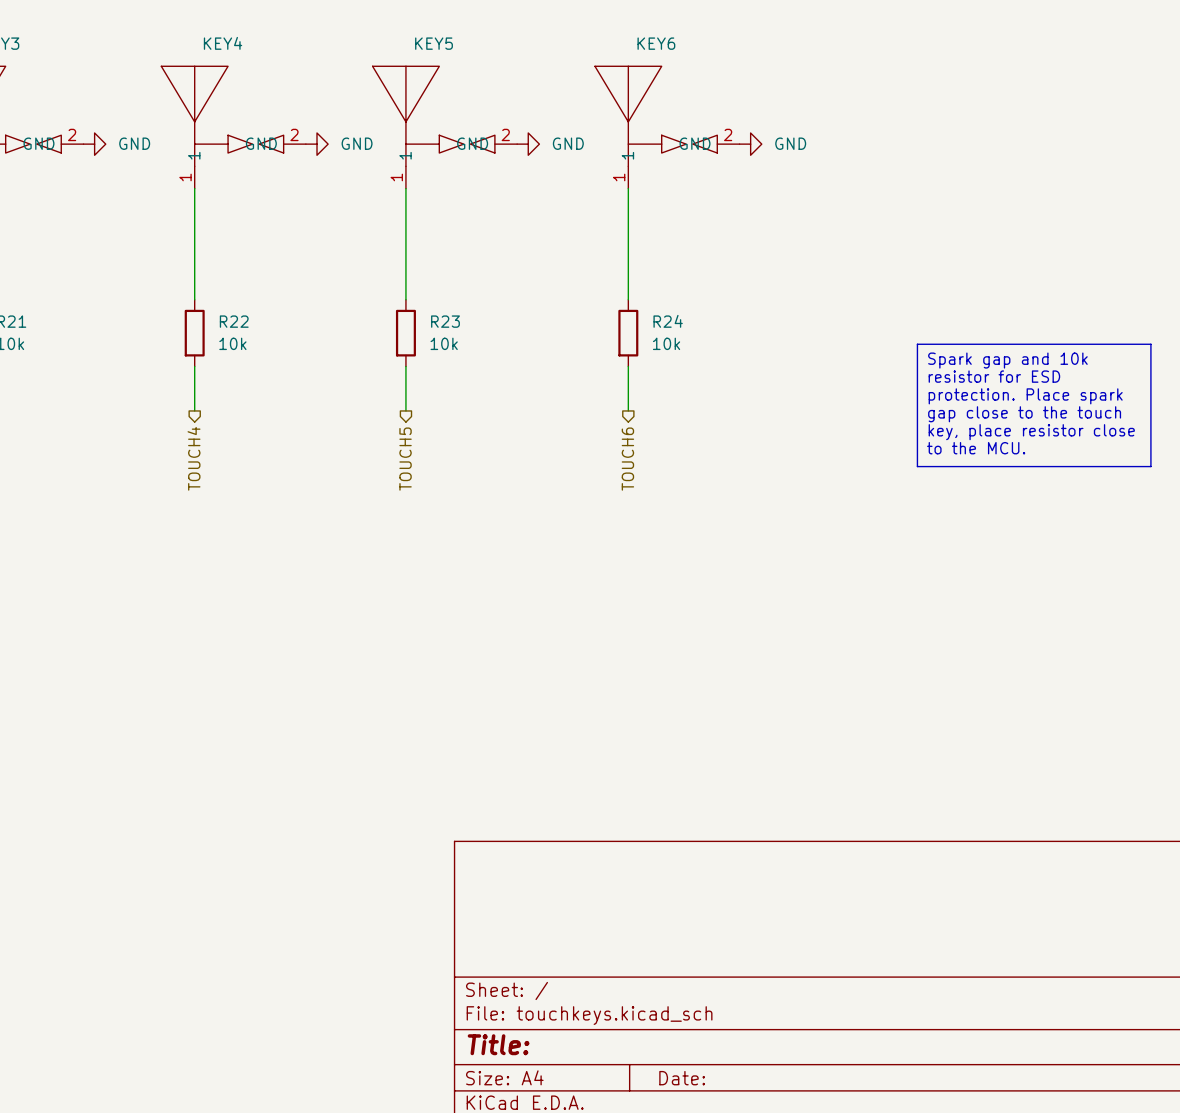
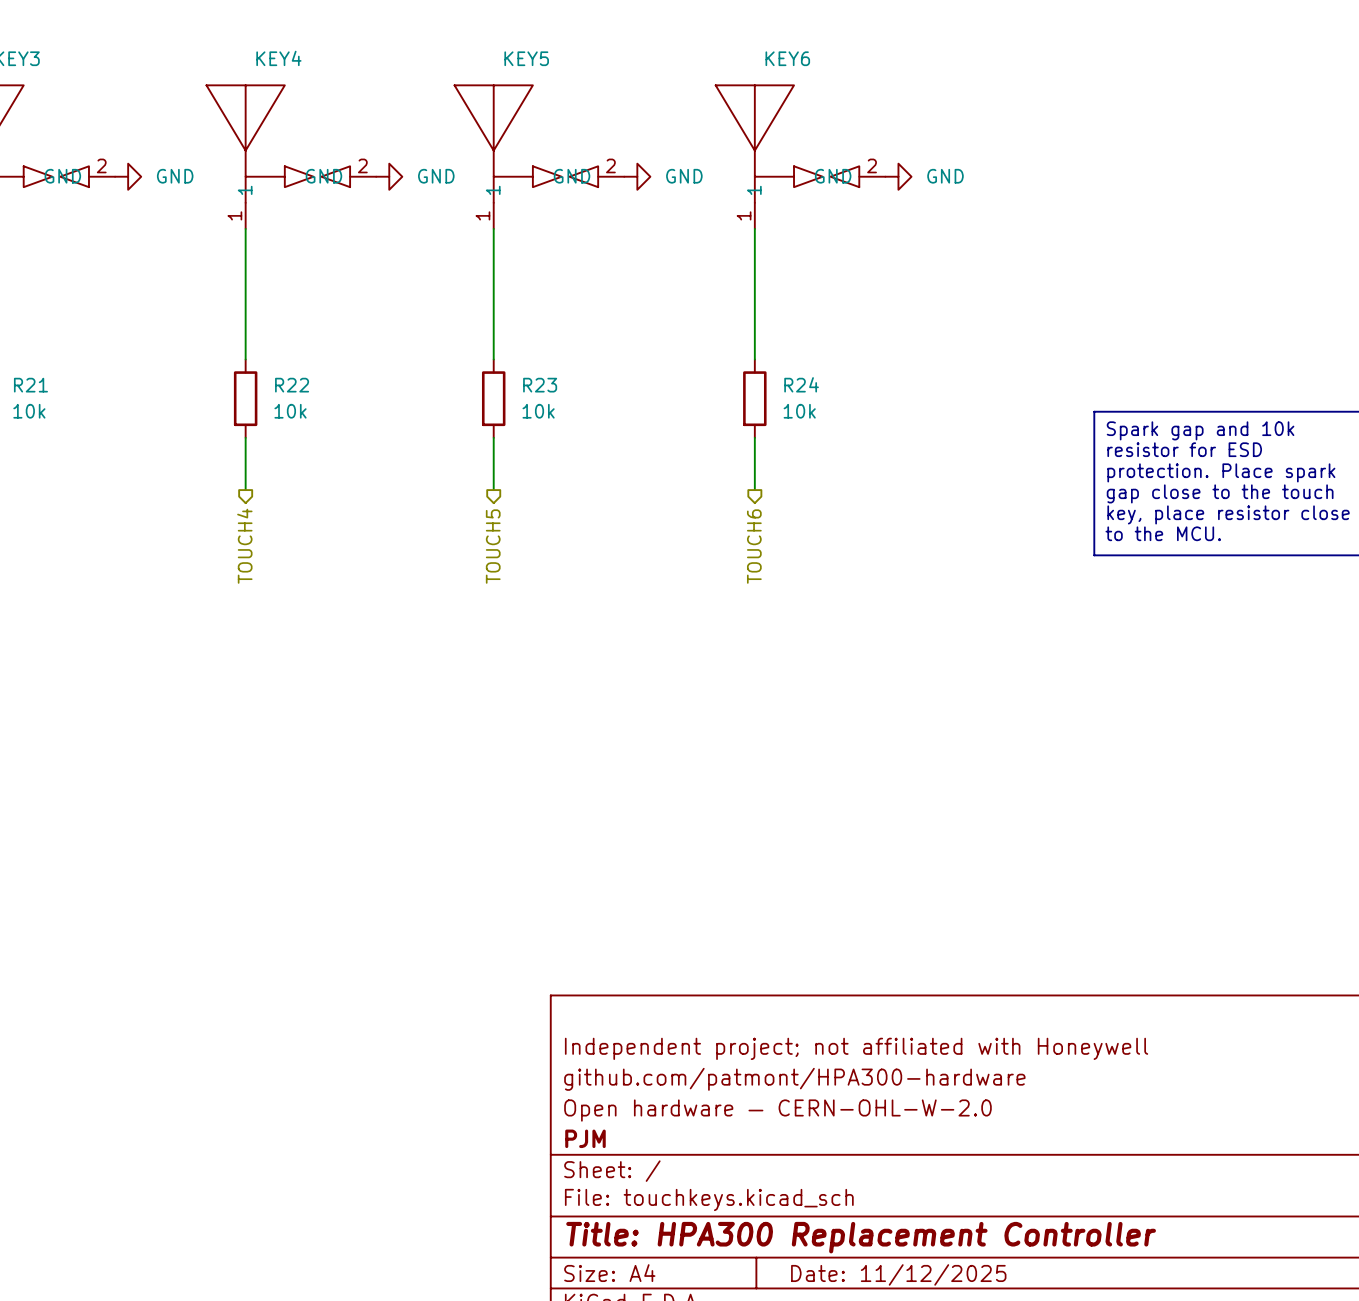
title block: none -> Independent project; not affiliated with Honeywell (856, 1048)
title block: none -> github.com/patmont/HPA300-hardware (794, 1079)
title block: none -> Open hardware — CERN-OHL-W-2.0 (777, 1110)
title block: none -> PJM (585, 1138)
title block: Title: (498, 1044) -> Title: HPA300 Replacement Controller (861, 1237)
title block: Date: (682, 1078) -> Date: 11/12/2025 (898, 1274)

